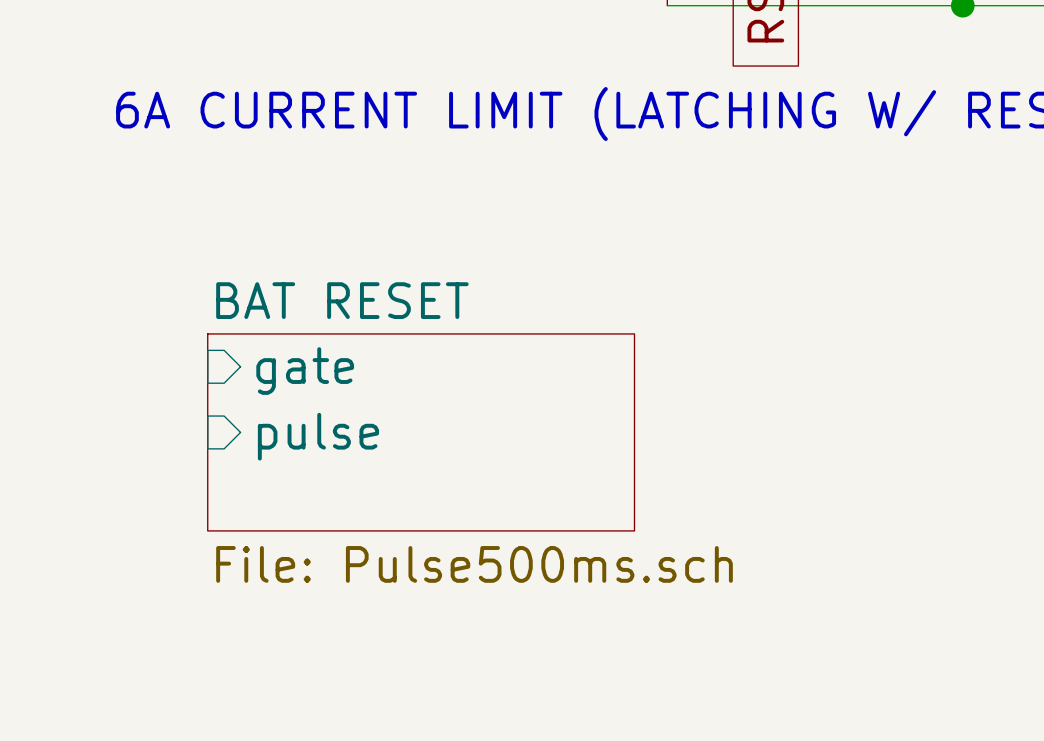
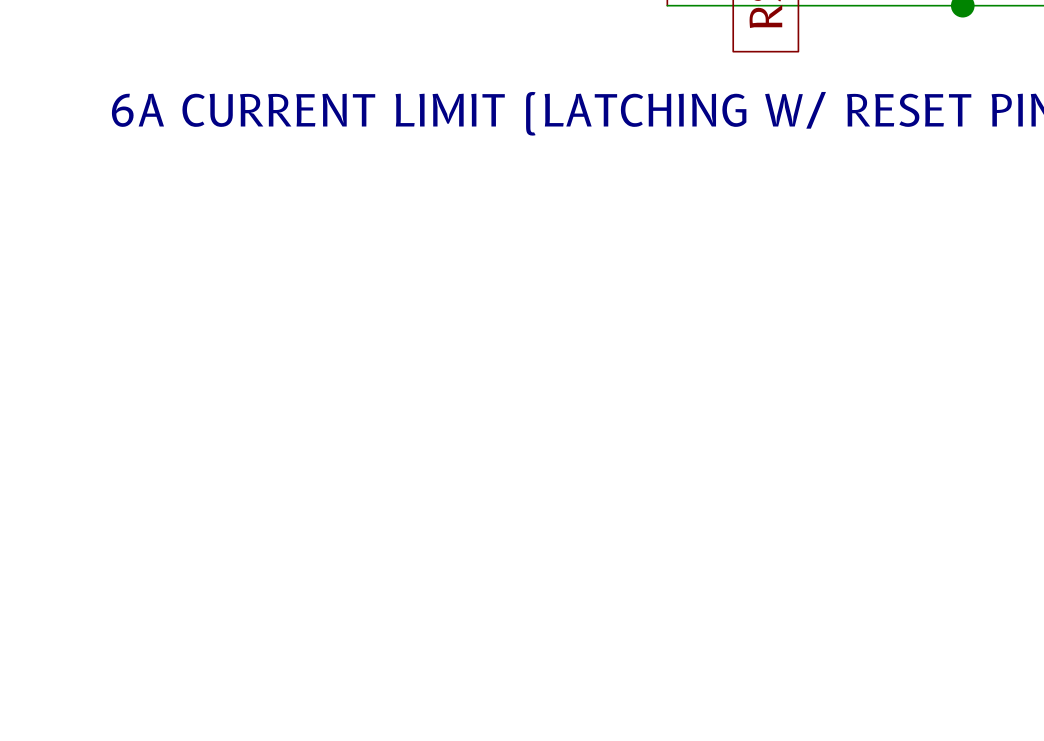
sheet pin: gate (305, 371) -> none
sheet BAT RESET: File: Pulse500ms.sch (421, 432) -> none
sheet pin: pulse (318, 436) -> none

